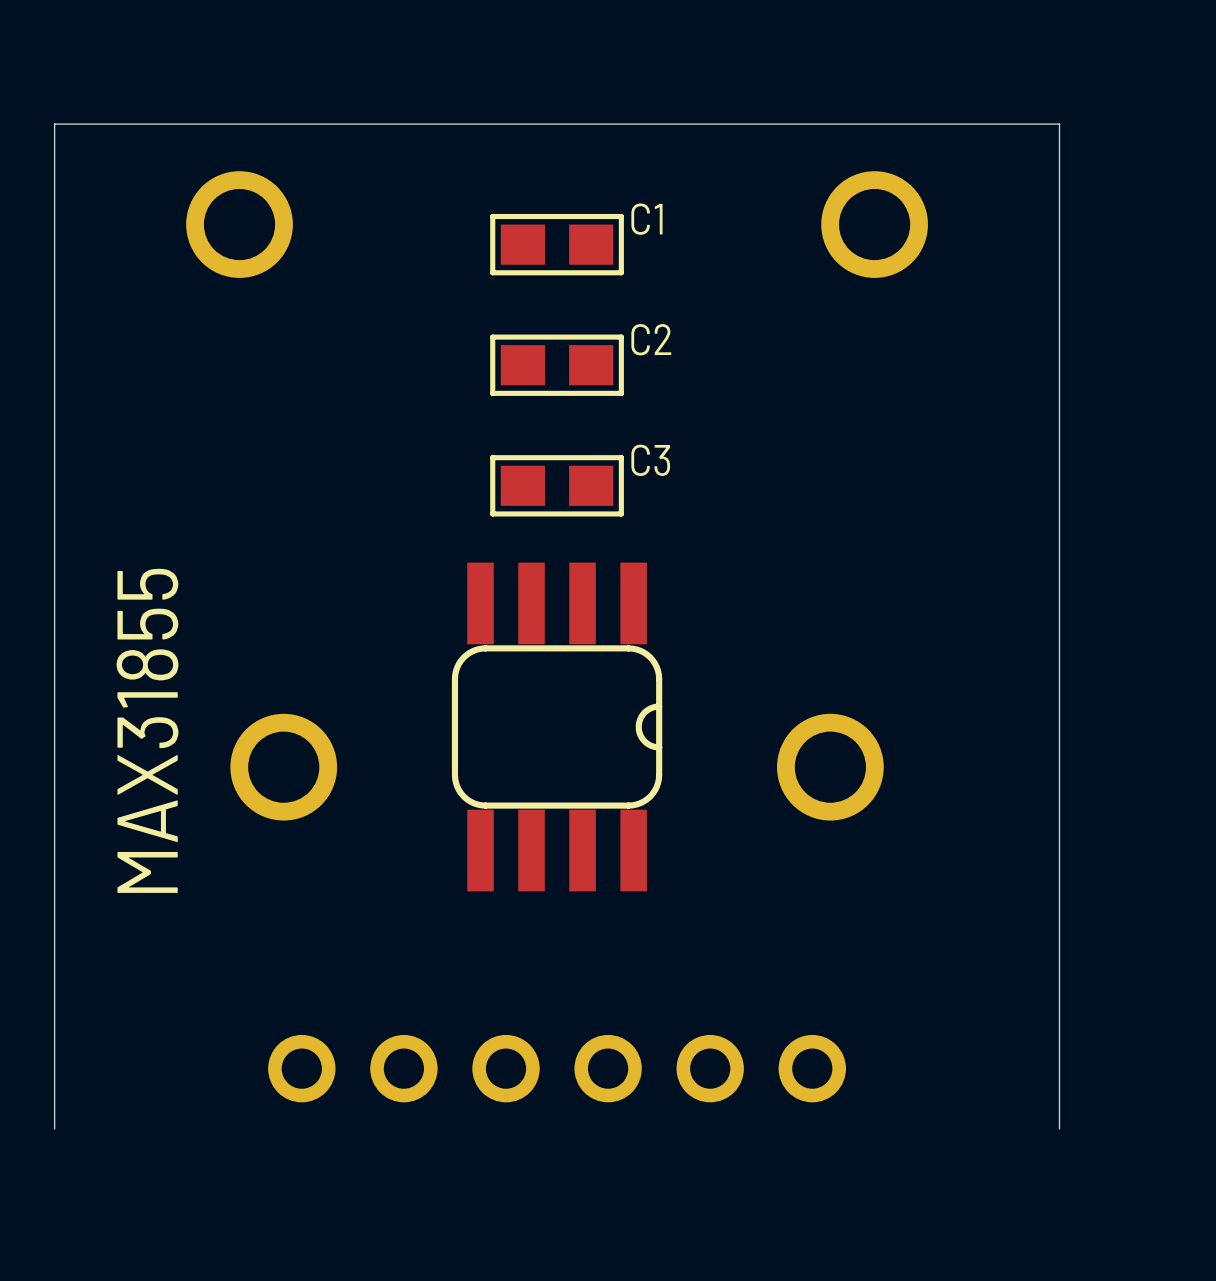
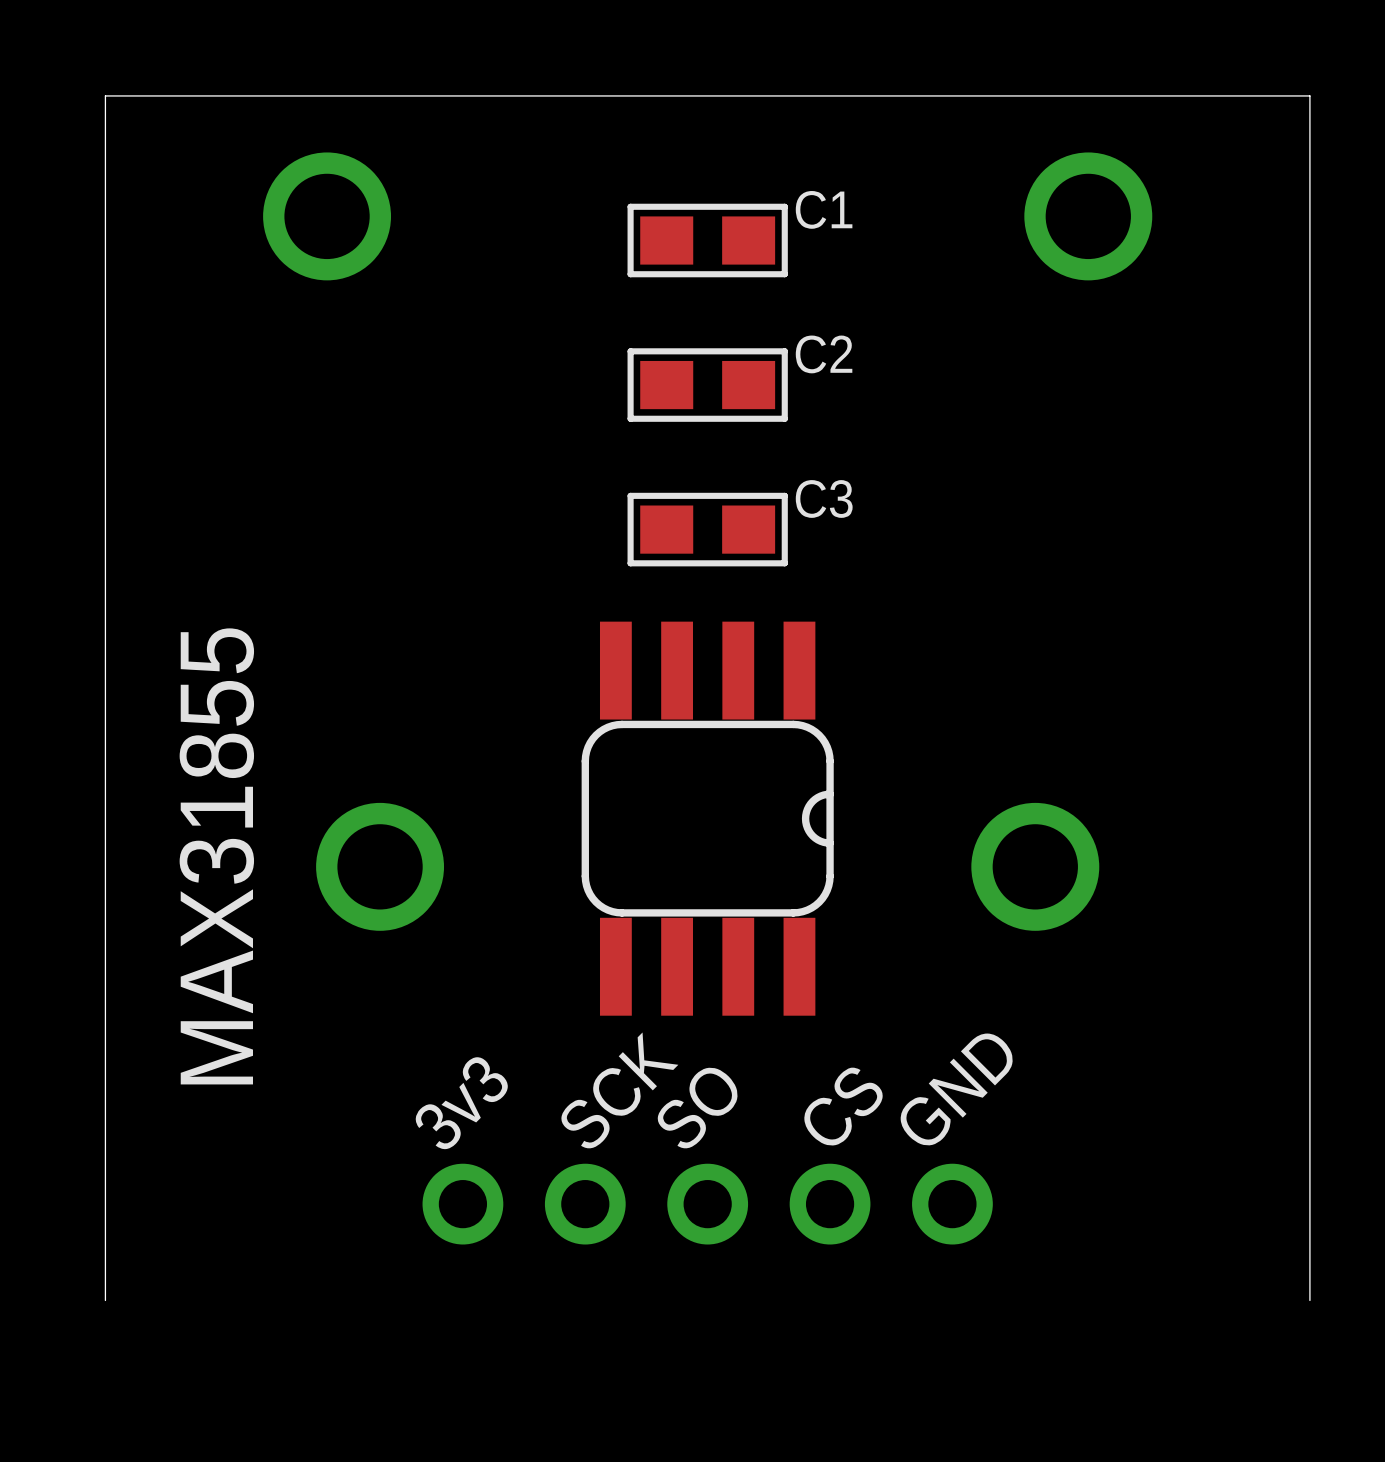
text: none -> SCK (619, 1092)
text: none -> GND (956, 1089)
text: none -> 3v3 (461, 1103)
text: none -> SO (697, 1109)
text: none -> CS (843, 1106)
part footprint: [268, 1034, 846, 1103] -> [422, 1163, 993, 1245]

